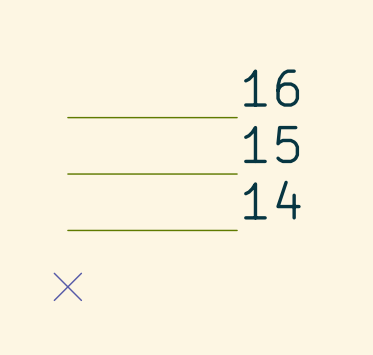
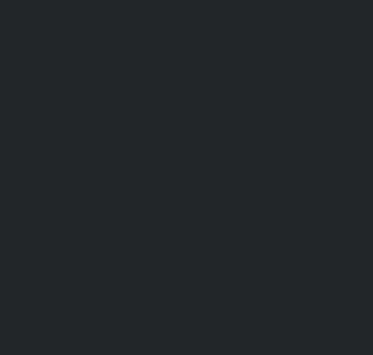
label: 16 (271, 88) -> none
wire: (67, 117) (237, 117) -> none
label: 15 (271, 144) -> none
wire: (67, 174) (237, 174) -> none
label: 14 (272, 200) -> none
wire: (67, 230) (237, 230) -> none
no-connect mark: (67, 286) -> none

